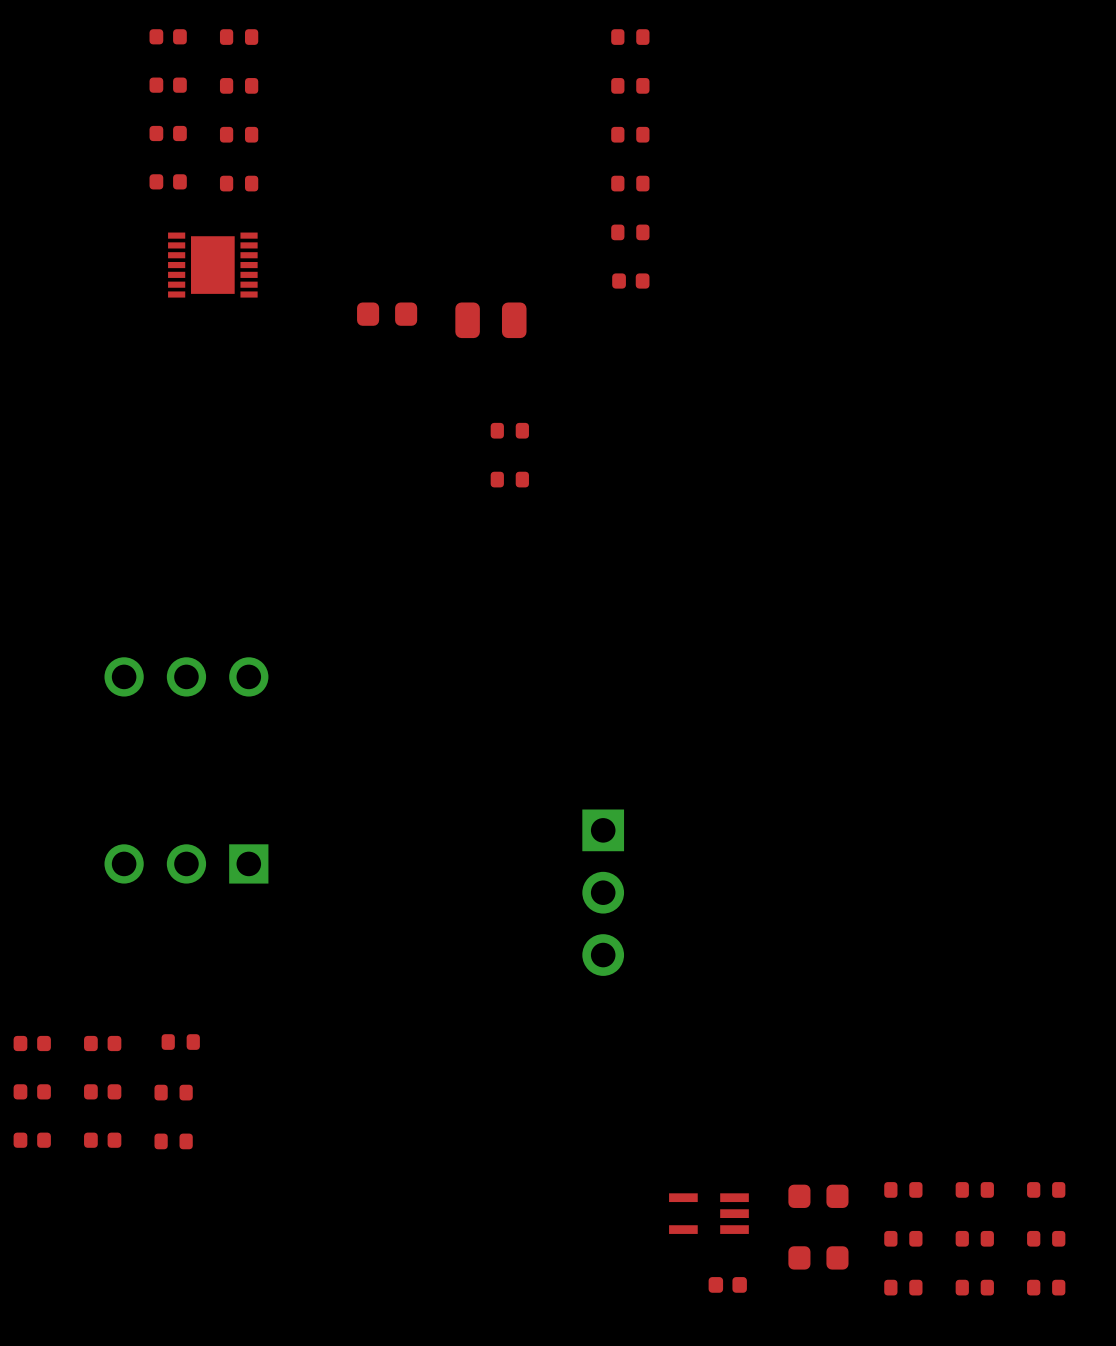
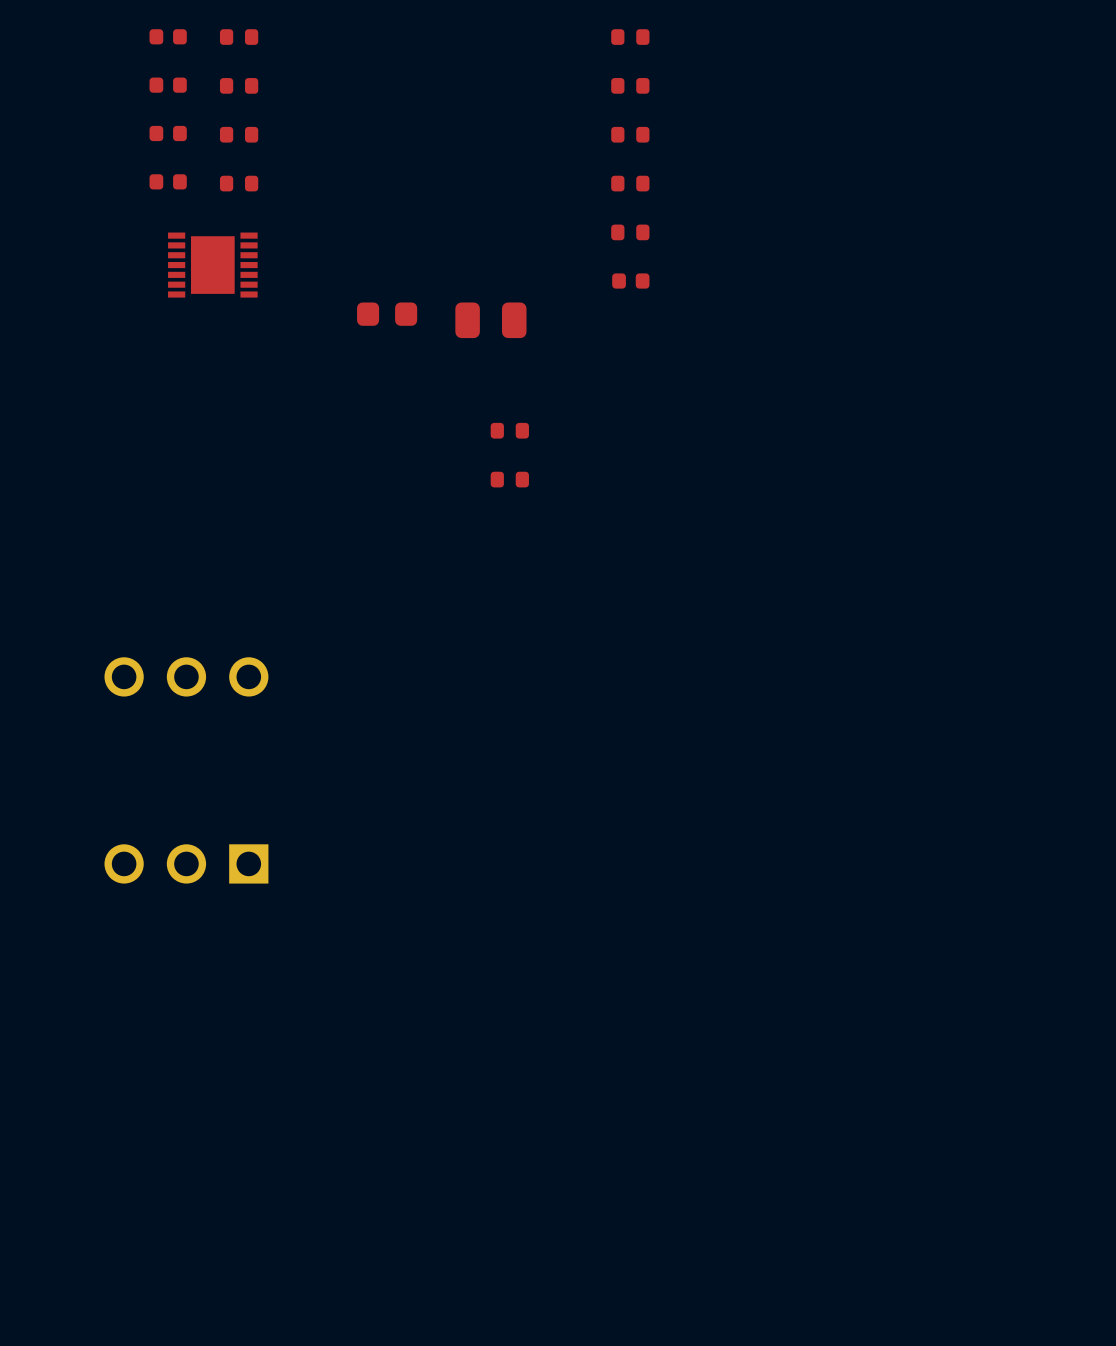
part: (603, 892) -> none
part: (180, 1042) -> none
part: (32, 1043) -> none
part: (102, 1043) -> none
part: (32, 1091) -> none
part: (102, 1091) -> none
part: (173, 1092) -> none
part: (32, 1140) -> none
part: (102, 1140) -> none
part: (173, 1141) -> none
part: (903, 1189) -> none
part: (974, 1189) -> none
part: (1046, 1189) -> none
part: (818, 1196) -> none
part: (708, 1213) -> none
part: (903, 1238) -> none
part: (974, 1238) -> none
part: (1046, 1238) -> none
part: (818, 1257) -> none
part: (727, 1284) -> none
part: (903, 1287) -> none
part: (974, 1287) -> none
part: (1046, 1287) -> none

